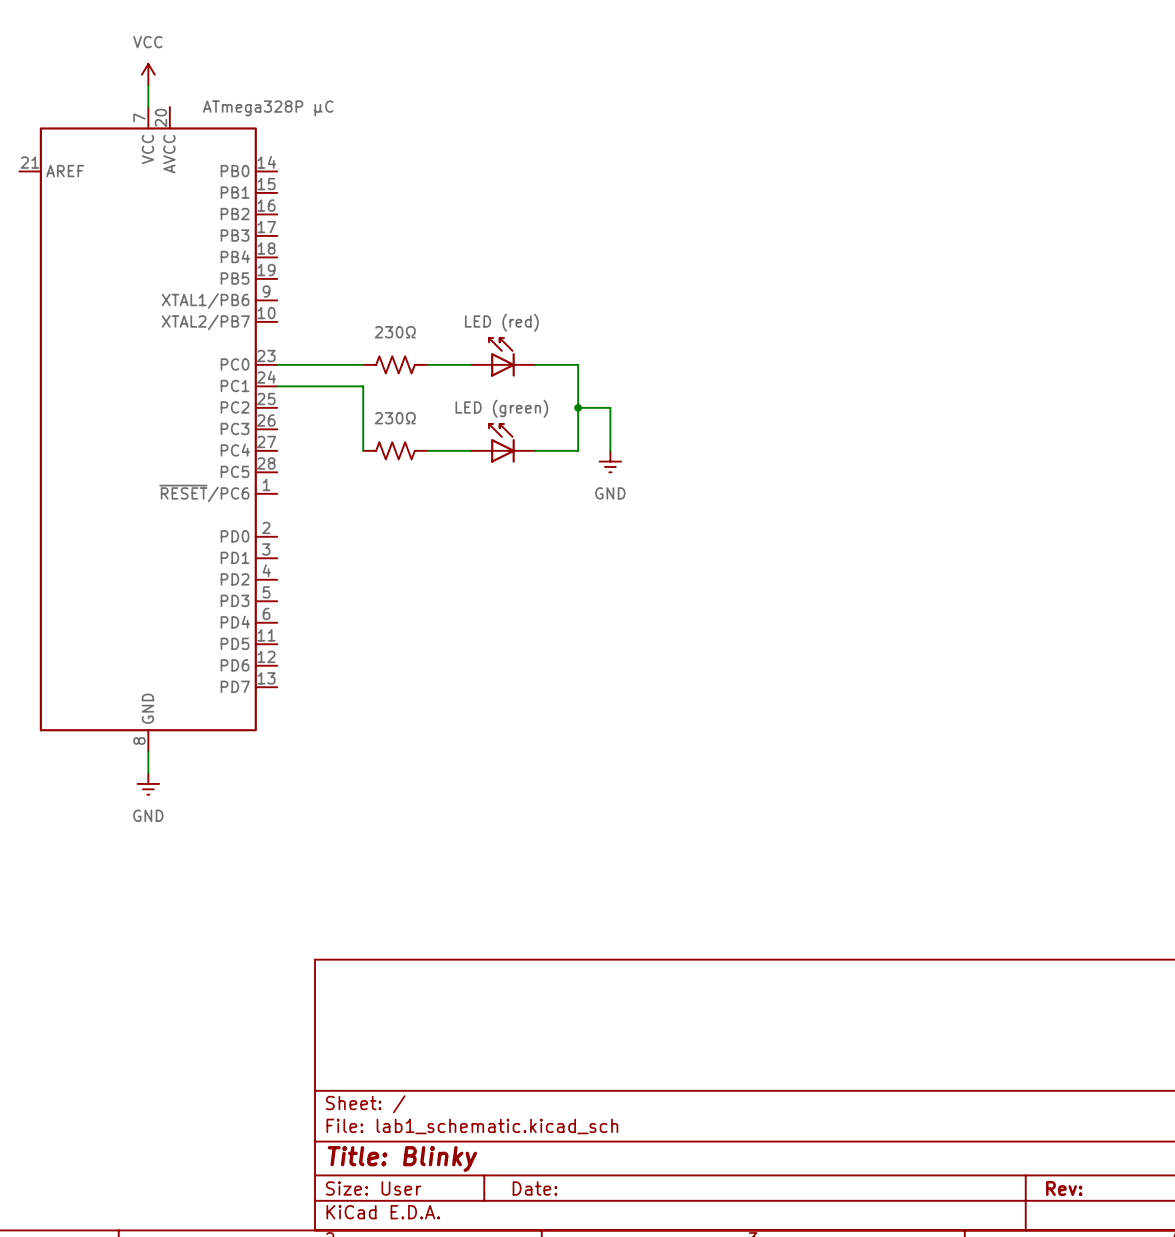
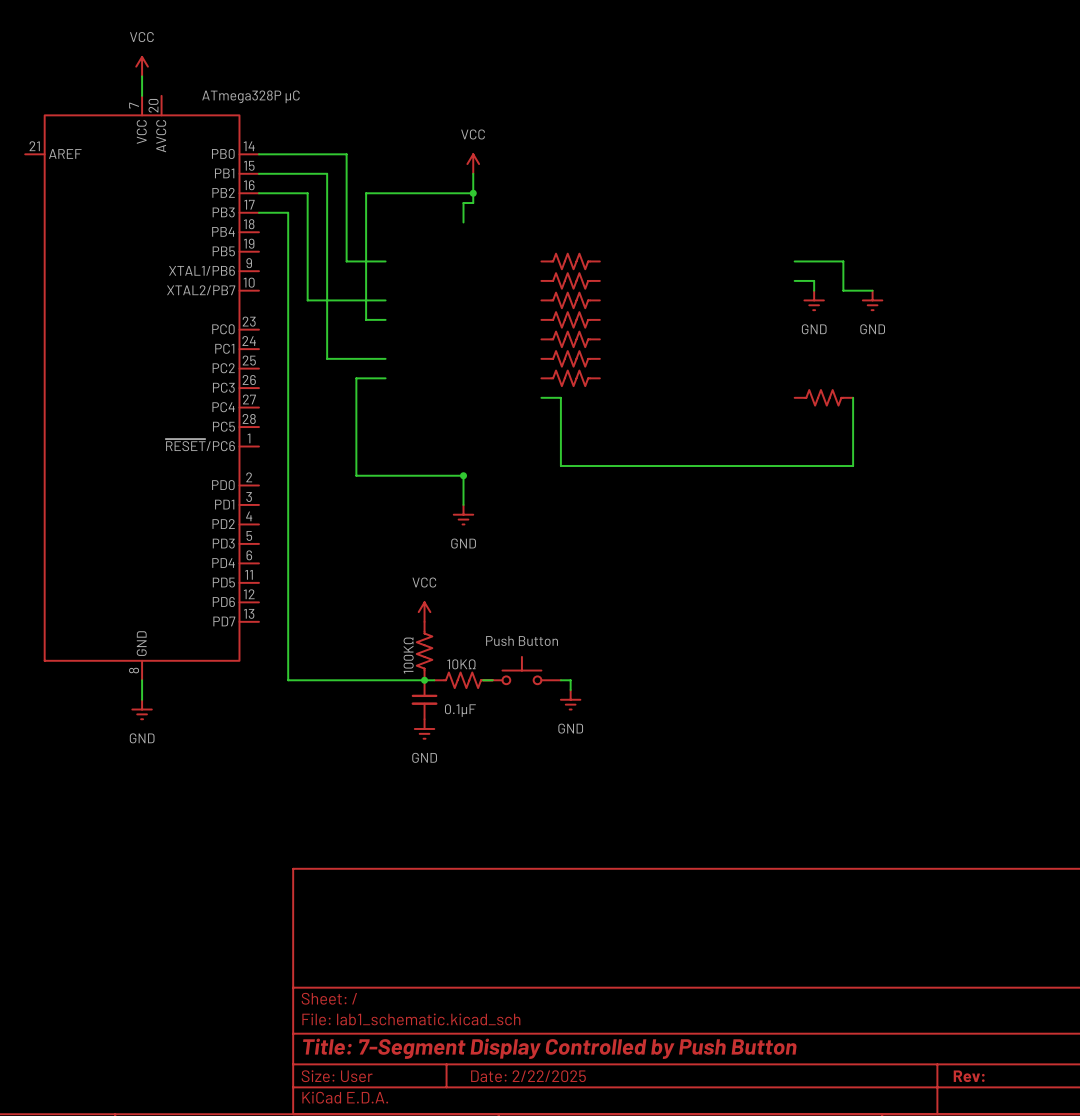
wire: none -> (258, 154) (346, 154) (346, 261) (385, 261)
power symbol: none -> VCC (473, 164)
wire: none -> (258, 173) (327, 173) (327, 358) (385, 358)
wire: none -> (473, 173) (473, 203) (463, 203) (463, 222)
wire: none -> (258, 193) (307, 193) (307, 300) (385, 300)
wire: none -> (473, 193) (366, 193) (366, 319) (385, 319)
junction: none -> (473, 193)
wire: none -> (258, 212) (288, 212) (288, 680) (434, 680)
part: none -> (570, 261)
wire: none -> (794, 261) (843, 261) (843, 290) (872, 290)
part: none -> (570, 280)
wire: none -> (794, 280) (814, 280) (814, 290)
part: none -> (570, 300)
power symbol: none -> GND (814, 300)
power symbol: none -> GND (872, 300)
part: none -> (570, 319)
part: LED (red) (502, 357) -> none
wire: (277, 364) (363, 364) -> none
part: 230Ω (395, 364) -> none
wire: (427, 364) (470, 364) -> none
wire: (535, 364) (578, 364) (578, 450) (535, 450) -> none
part: none -> (570, 339)
wire: (277, 386) (363, 386) (363, 450) -> none
part: none -> (570, 358)
wire: (578, 407) (610, 407) (610, 440) -> (541, 397) (560, 397)
junction: (578, 407) -> none
wire: none -> (385, 378) (356, 378) (356, 475) (463, 475) (463, 504)
part: none -> (570, 378)
part: none -> (823, 397)
wire: none -> (853, 397) (853, 466) (560, 466) (560, 407)
part: LED (green) (502, 443) -> none
part: 230Ω (395, 450) -> none
wire: (427, 450) (470, 450) -> none
power symbol position: GND (610, 461) -> GND (463, 514)
junction: none -> (463, 475)
power symbol: none -> VCC (424, 612)
part: none -> 100KΩ (424, 651)
part: none -> Push Button (521, 670)
junction: none -> (424, 680)
part: none -> 10KΩ (463, 680)
wire: none -> (482, 680) (492, 680)
wire: none -> (560, 680) (570, 680) (570, 690)
part: none -> 0.1µF (424, 699)
power symbol: none -> GND (570, 699)
power symbol: none -> GND (424, 728)
title block: Title: Blinky (402, 1159) -> Title: 7-Segment Display Controlled by Push Button (549, 1048)
title block: Date: (534, 1188) -> Date: 2/22/2025 (528, 1076)

